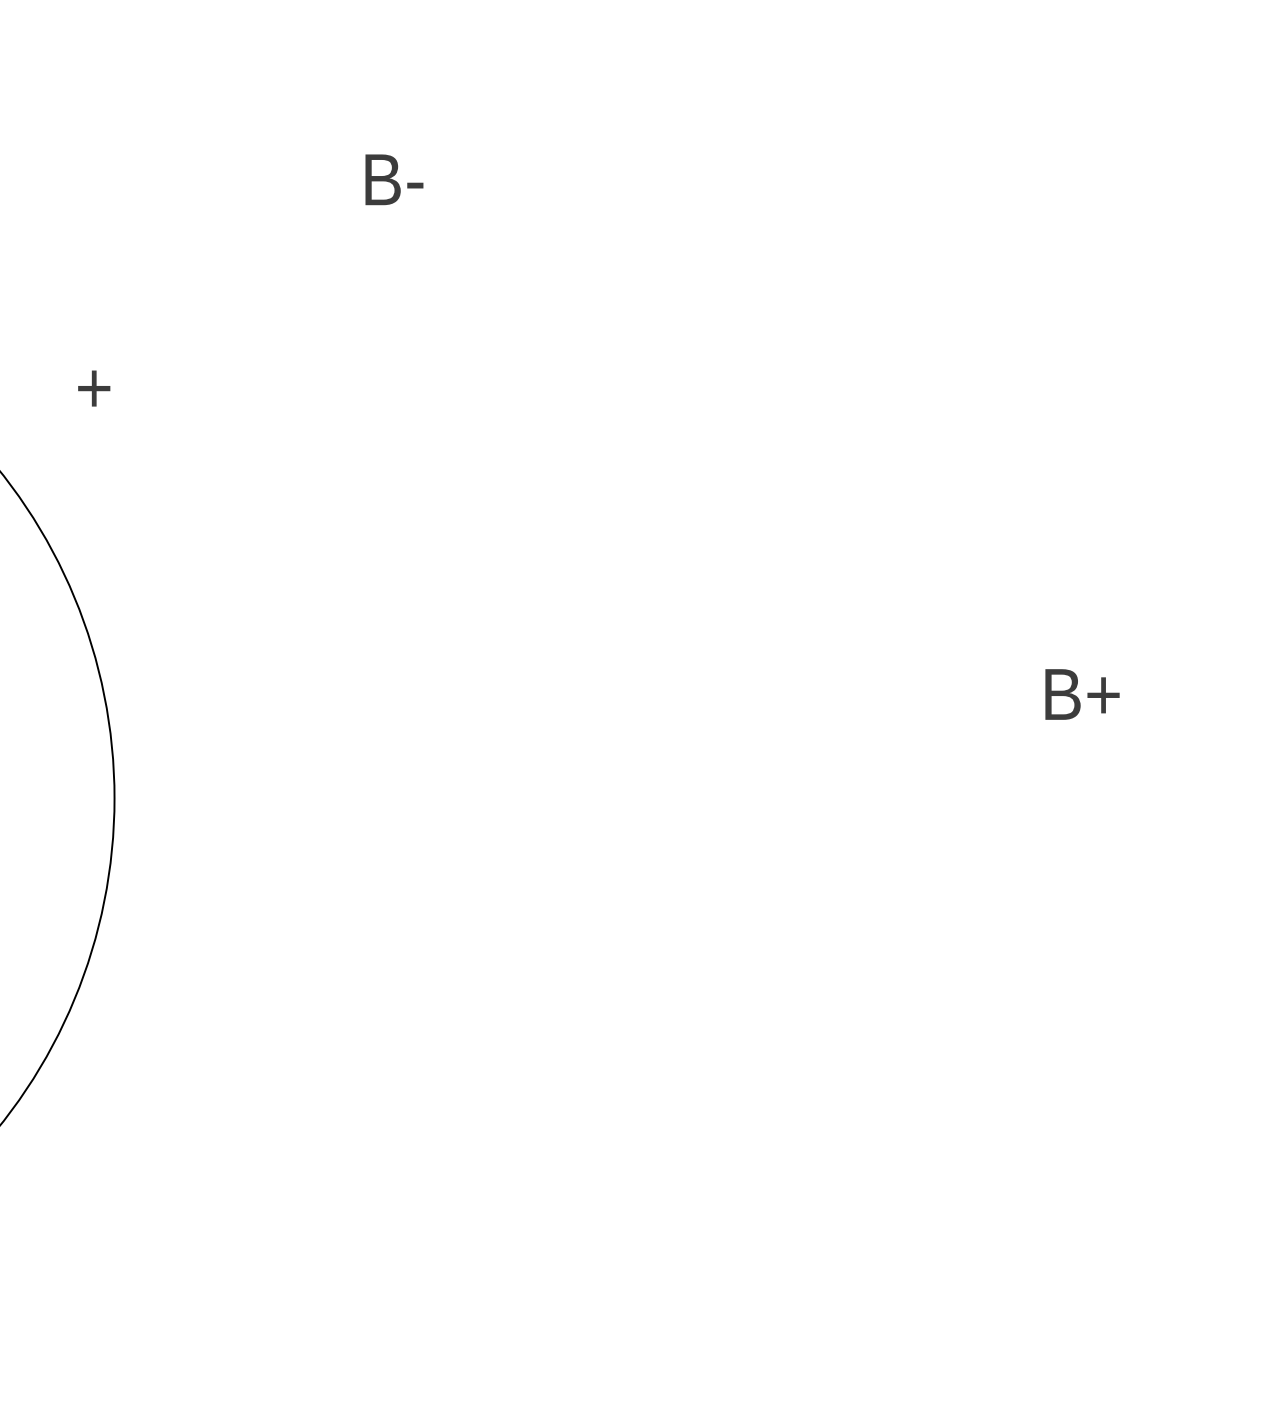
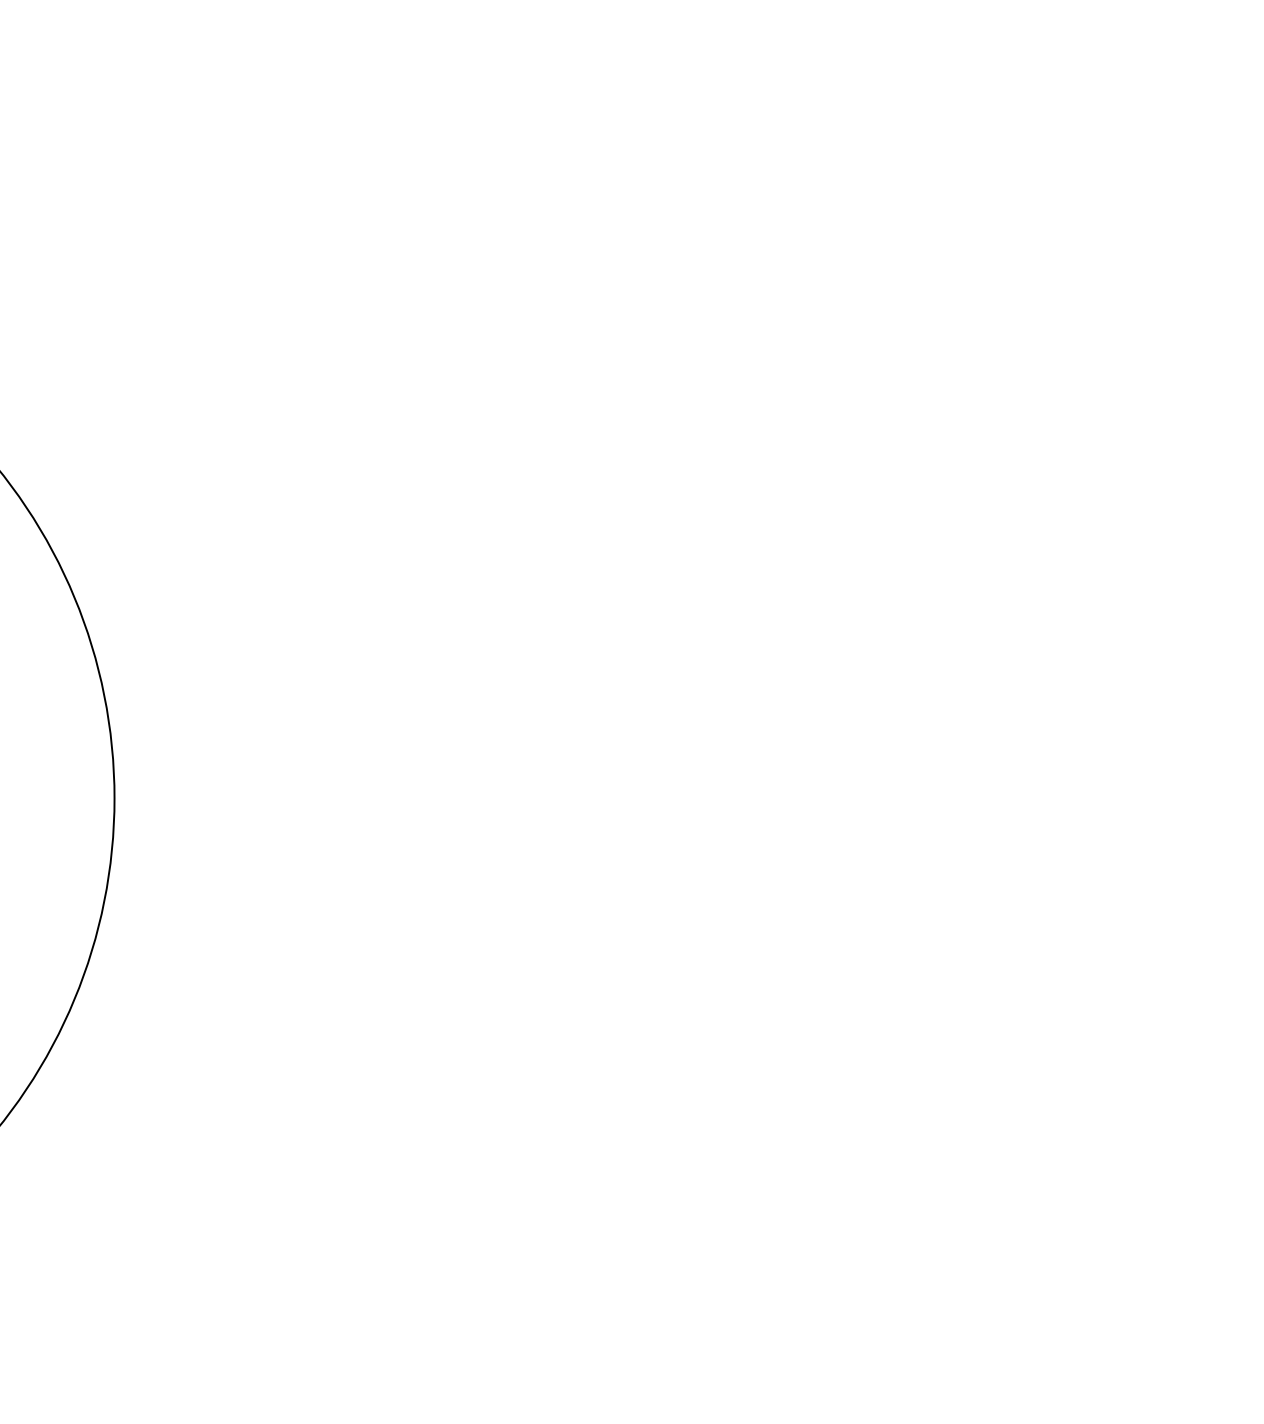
text: B- (394, 179) -> none
text: + (94, 388) -> none
text: B+ (1082, 694) -> none

